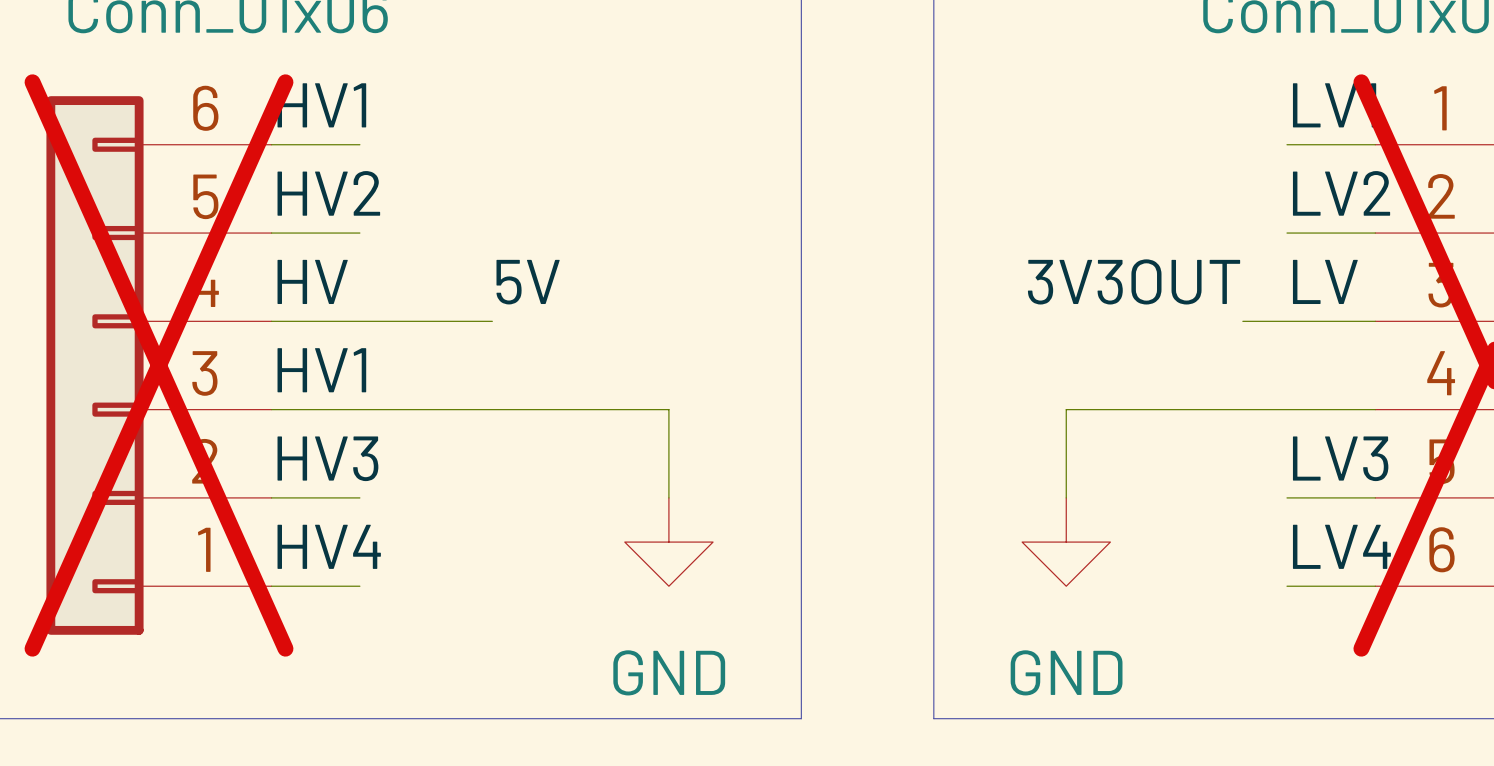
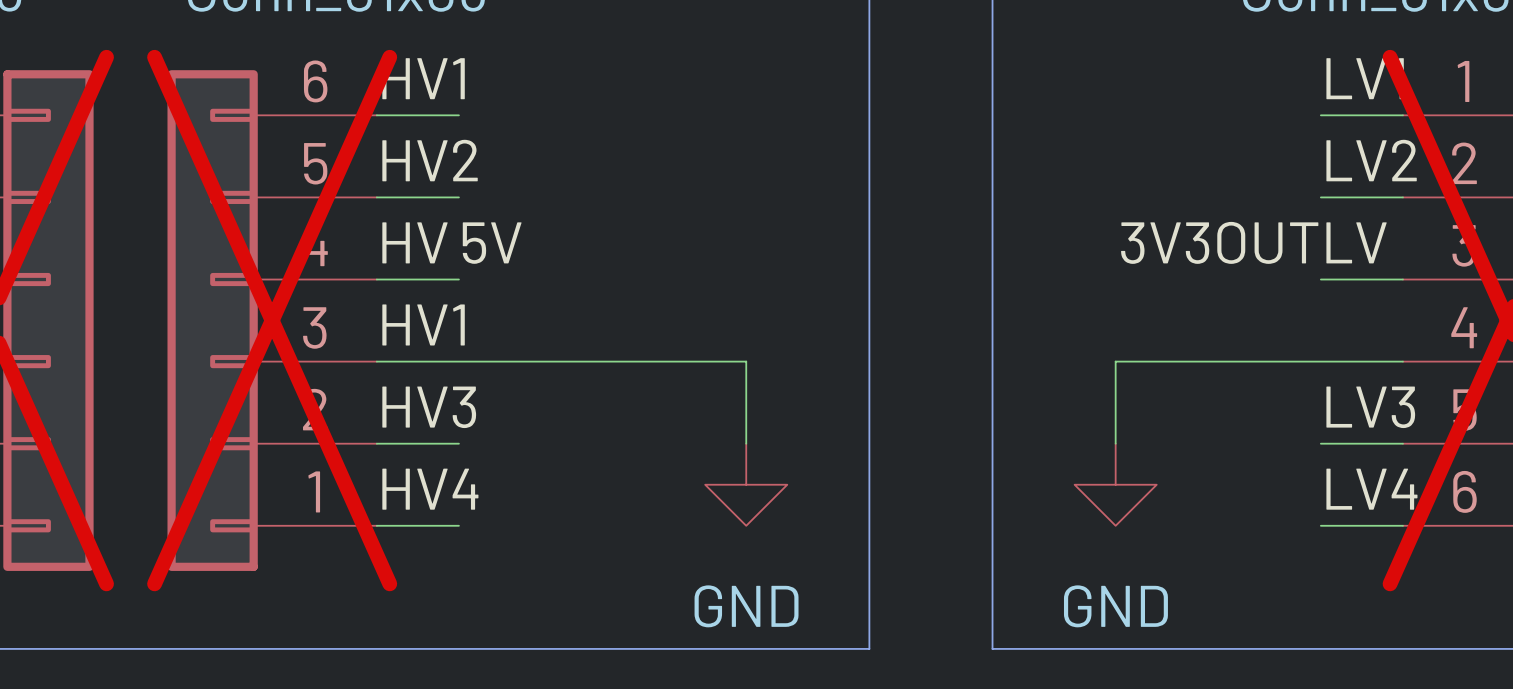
label position: 3V3OUT (1134, 281) -> 3V3OUT (1219, 242)
label position: 5V (528, 282) -> 5V (492, 243)
wire: (359, 321) (492, 321) -> none
wire: (1242, 321) (1287, 321) -> none

